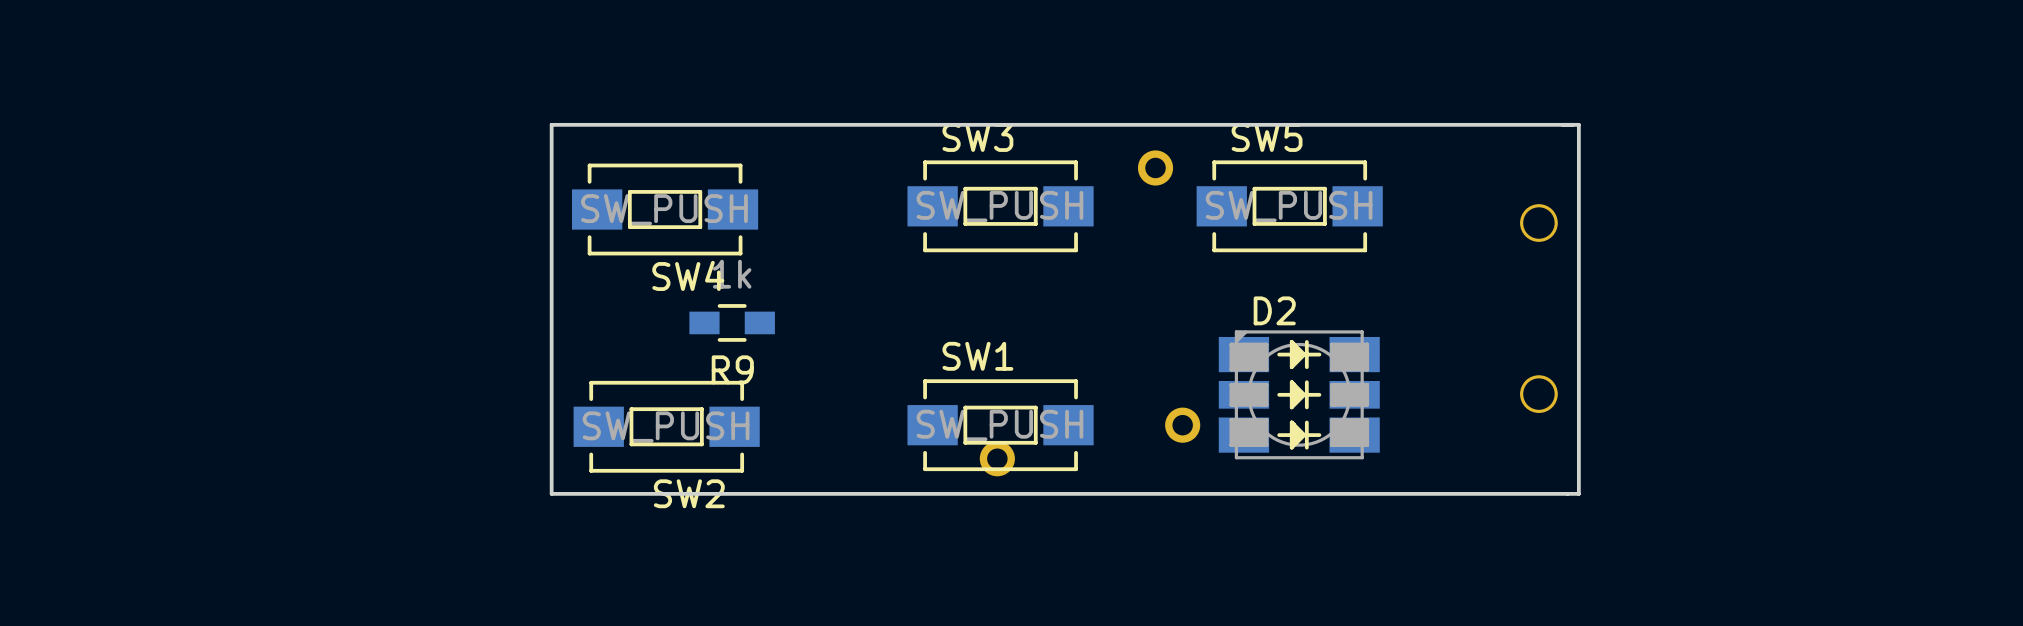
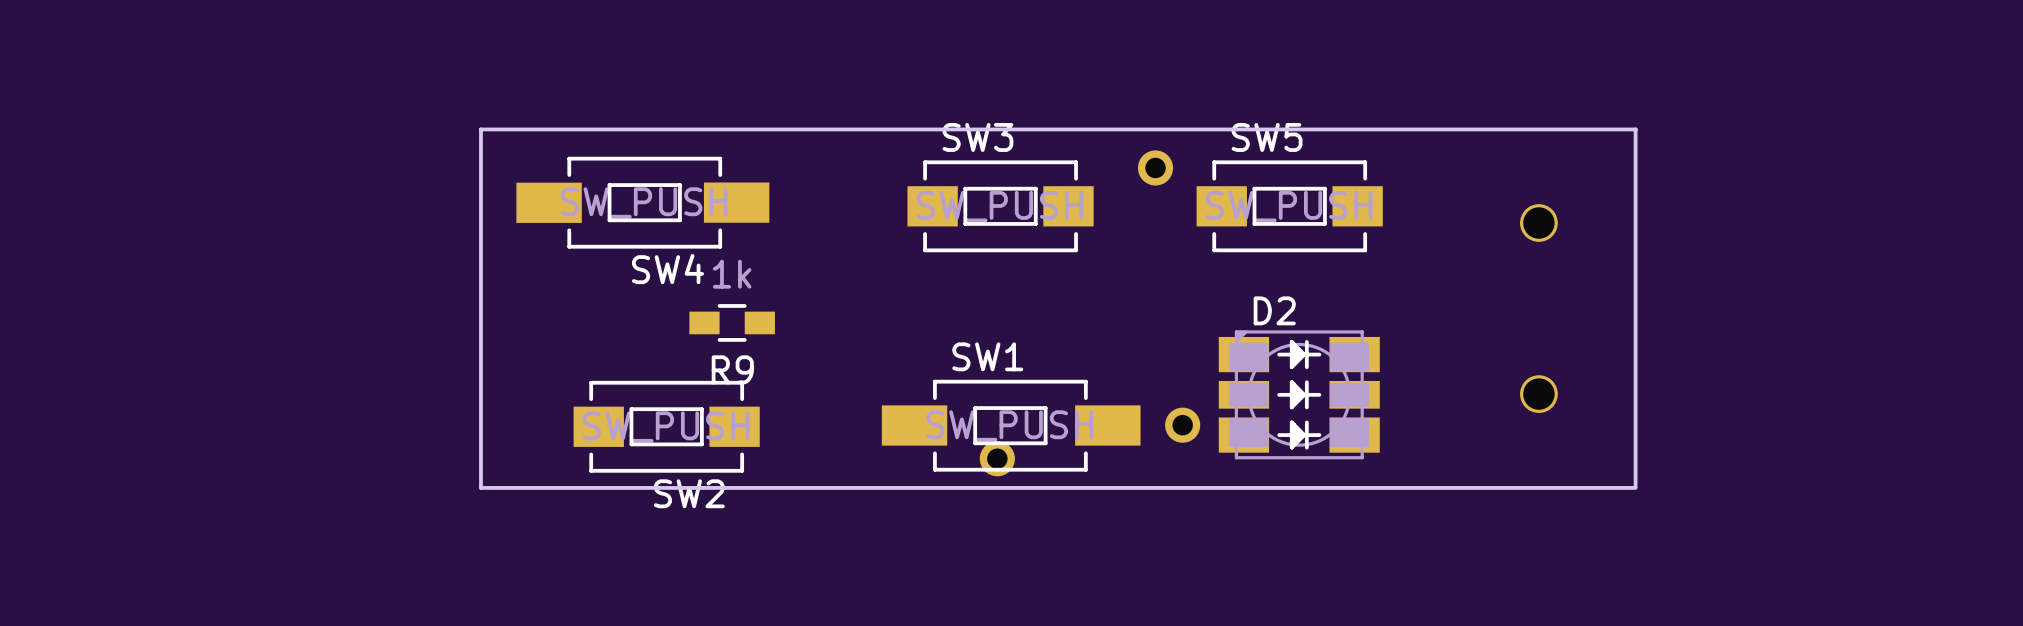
board edge: (1578, 124) (551, 124) (551, 493) (1578, 493) (1578, 124) -> none
board edge: none -> (1635, 129) (480, 129) (480, 487) (1635, 487)
board edge: none -> (1635, 129) (1635, 486)
SW4 footprint: [571, 163, 759, 256] -> [516, 156, 770, 249]
SW1 footprint: [907, 379, 1094, 472] -> [881, 379, 1141, 472]

